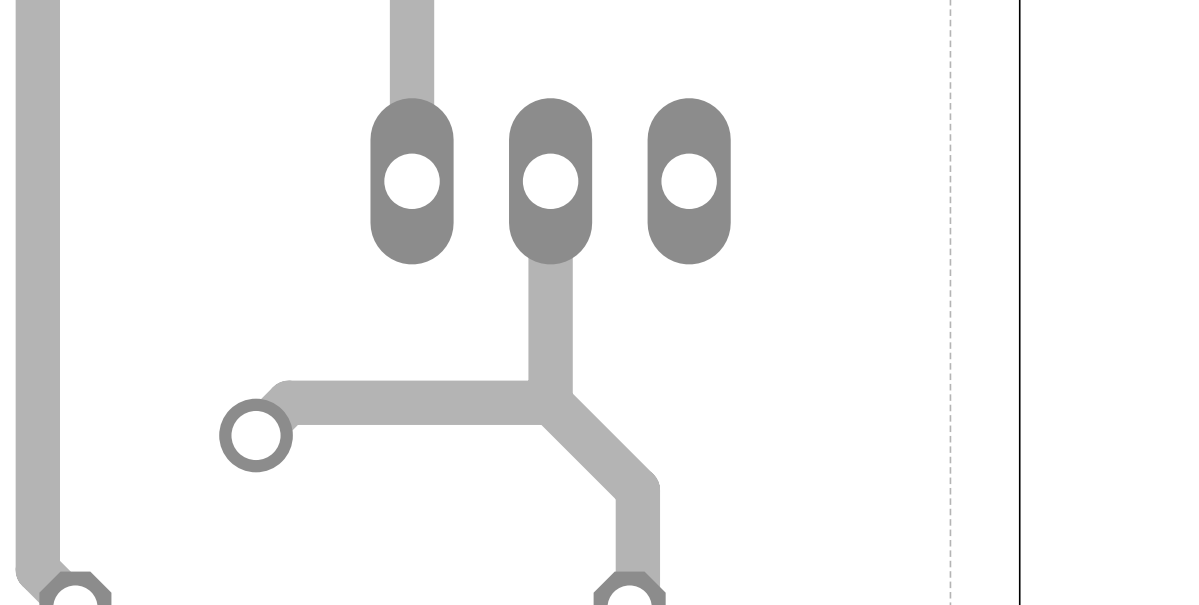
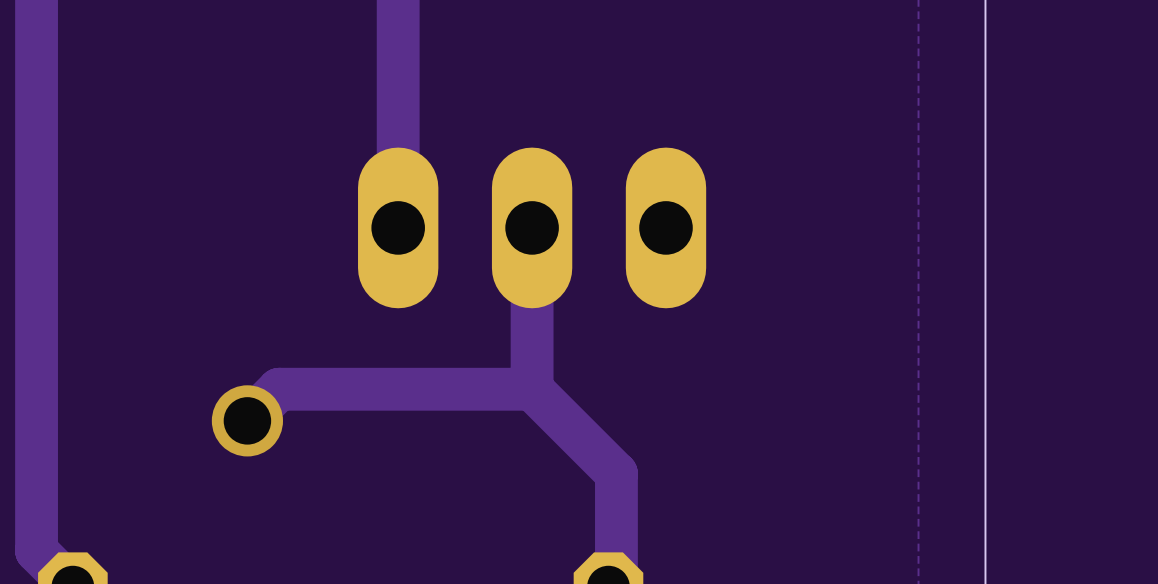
part position: (550, 181) -> (532, 227)

